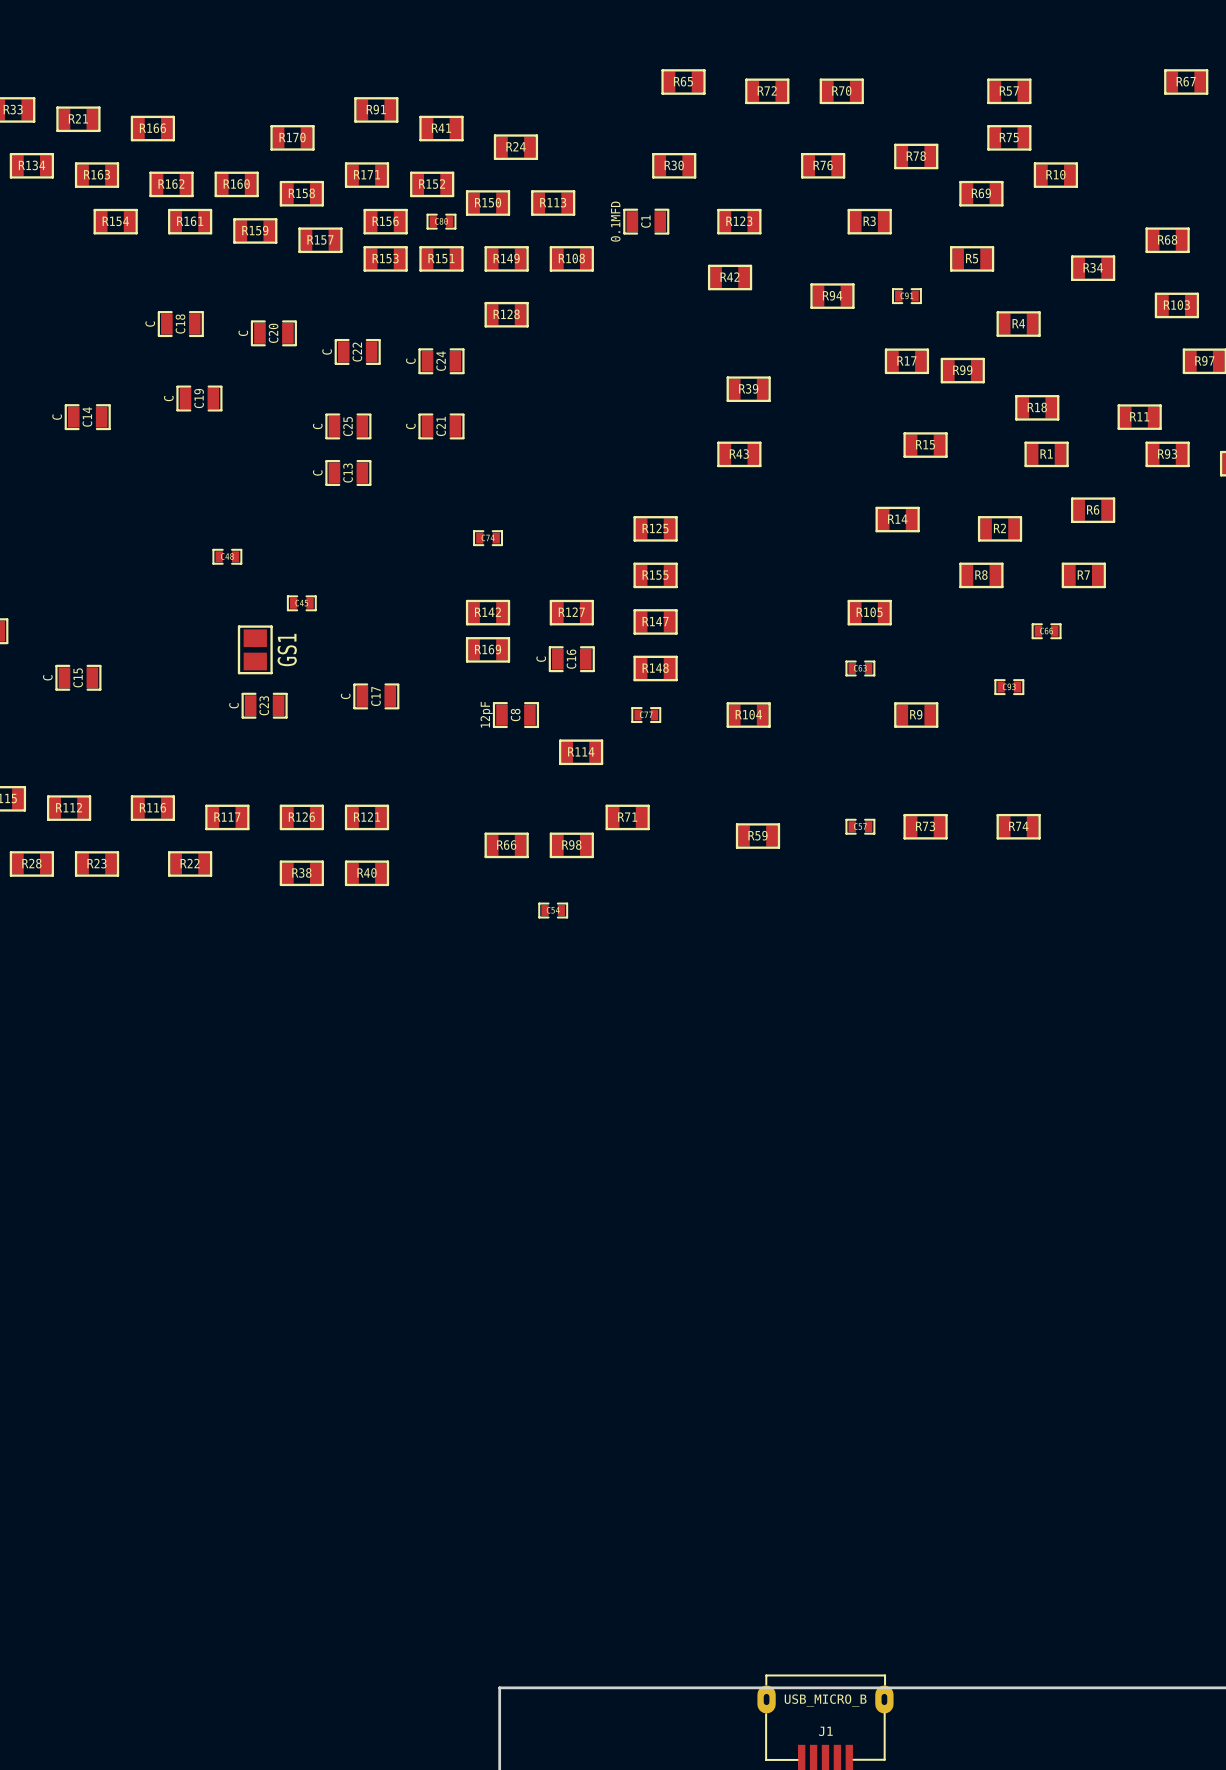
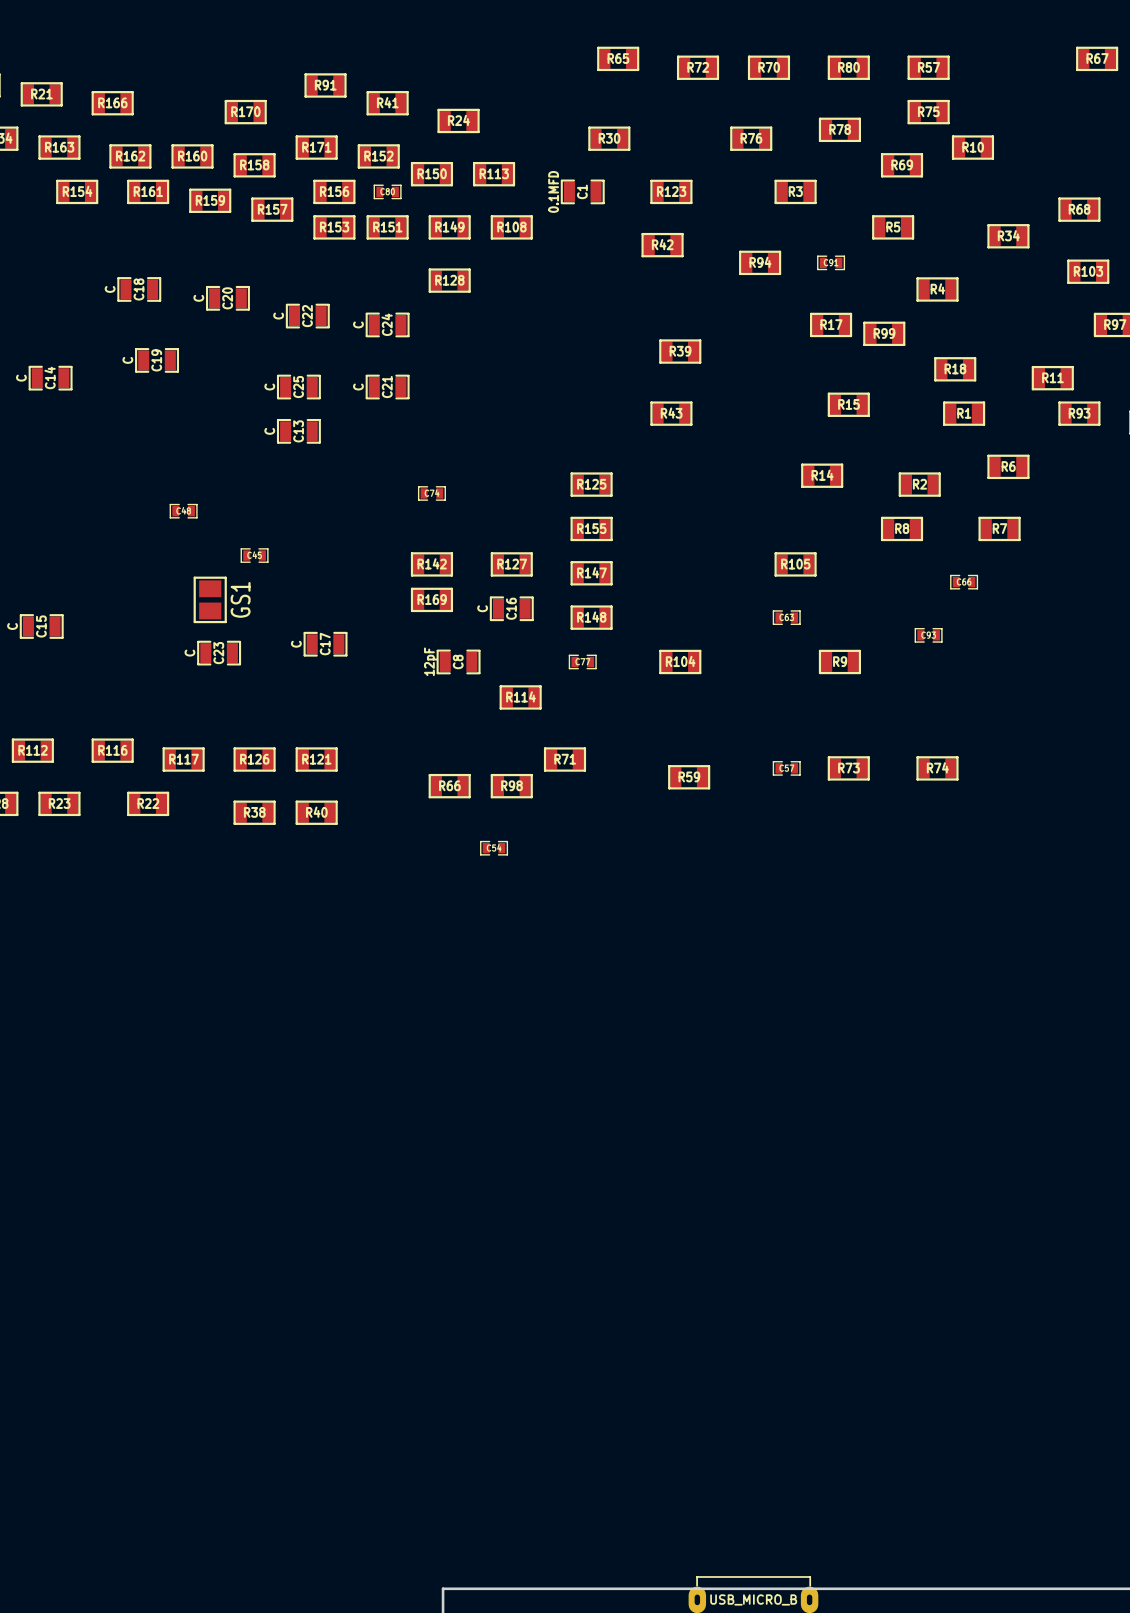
R80: none -> (848, 67)

